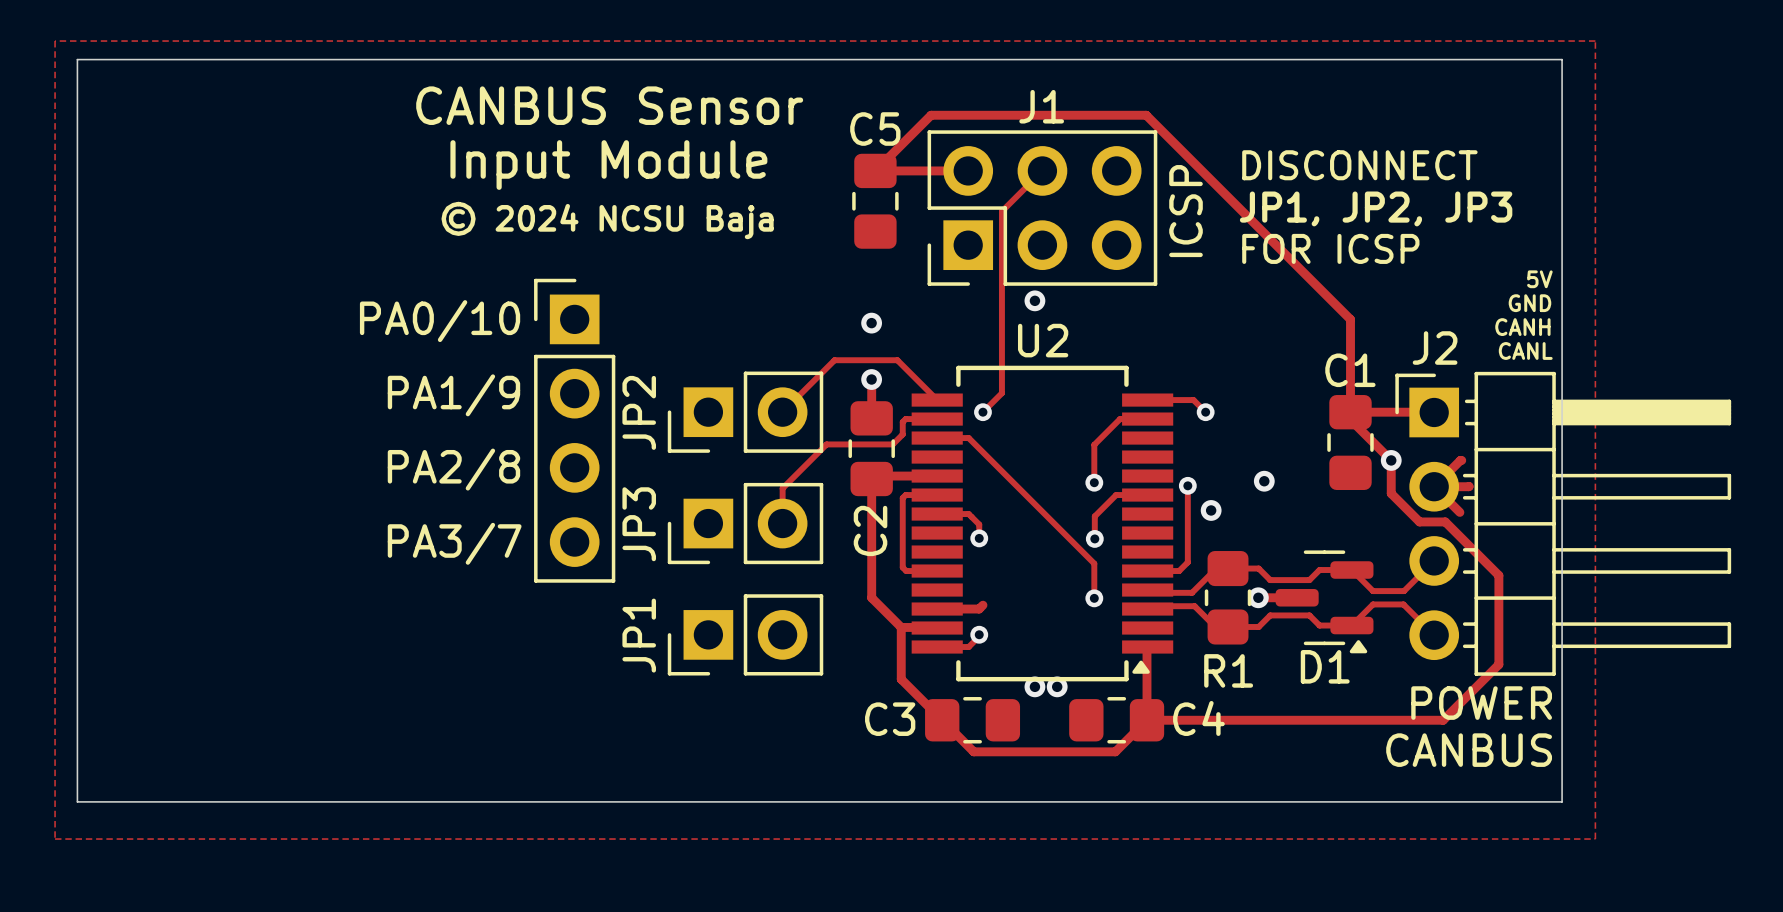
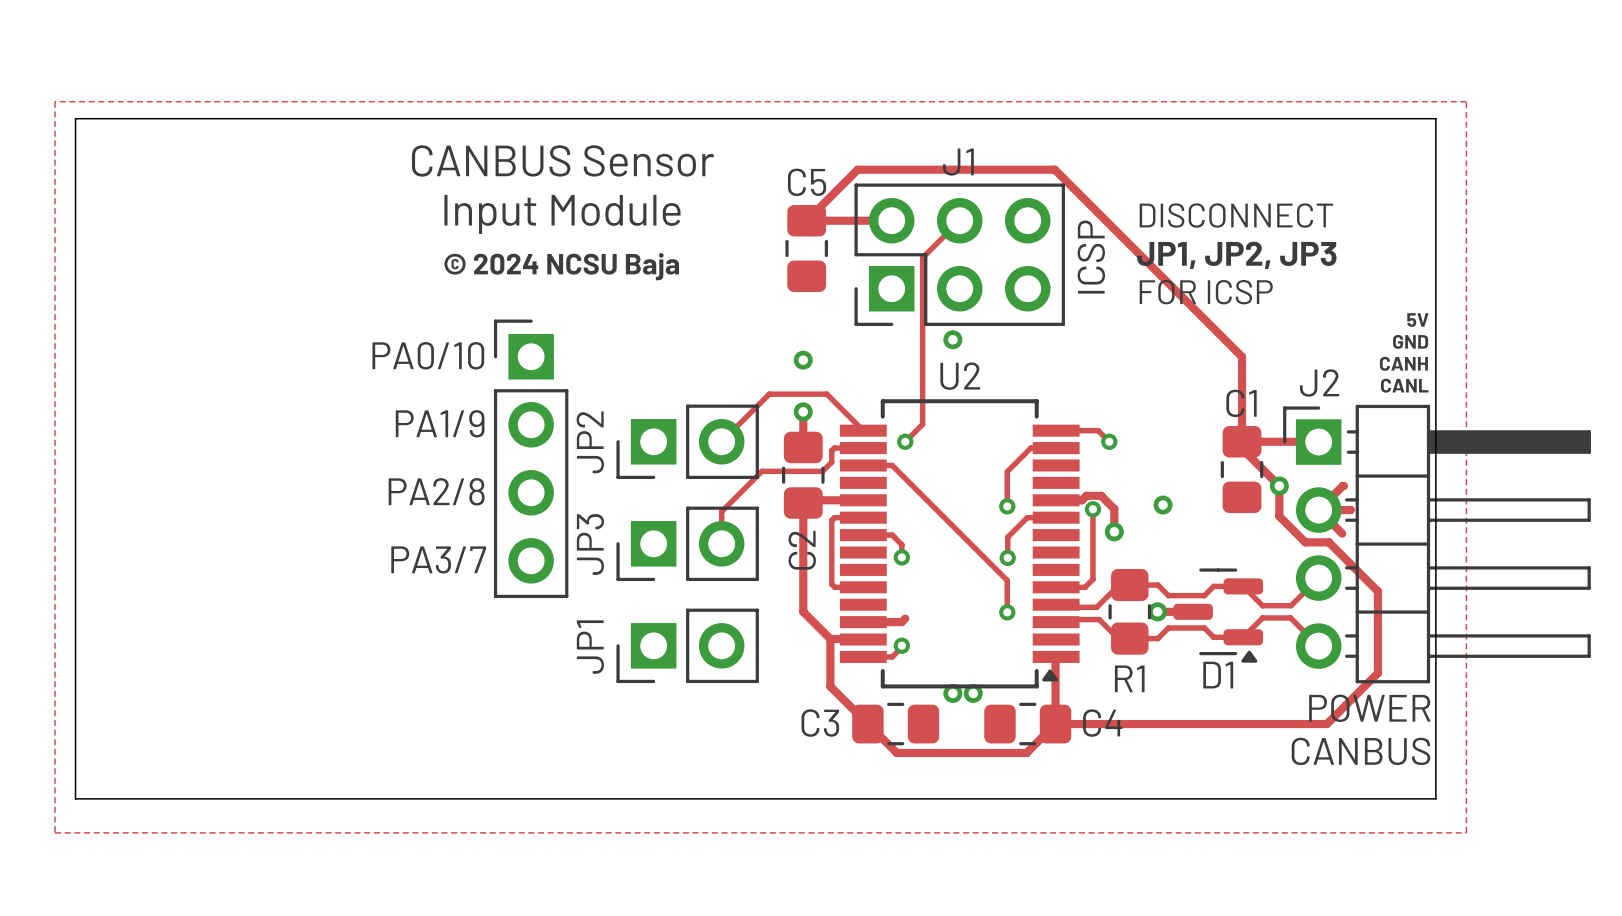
track: none -> (1056, 500) (1082, 500) (1086, 495) (1101, 495) (1114, 509) (1114, 531)

